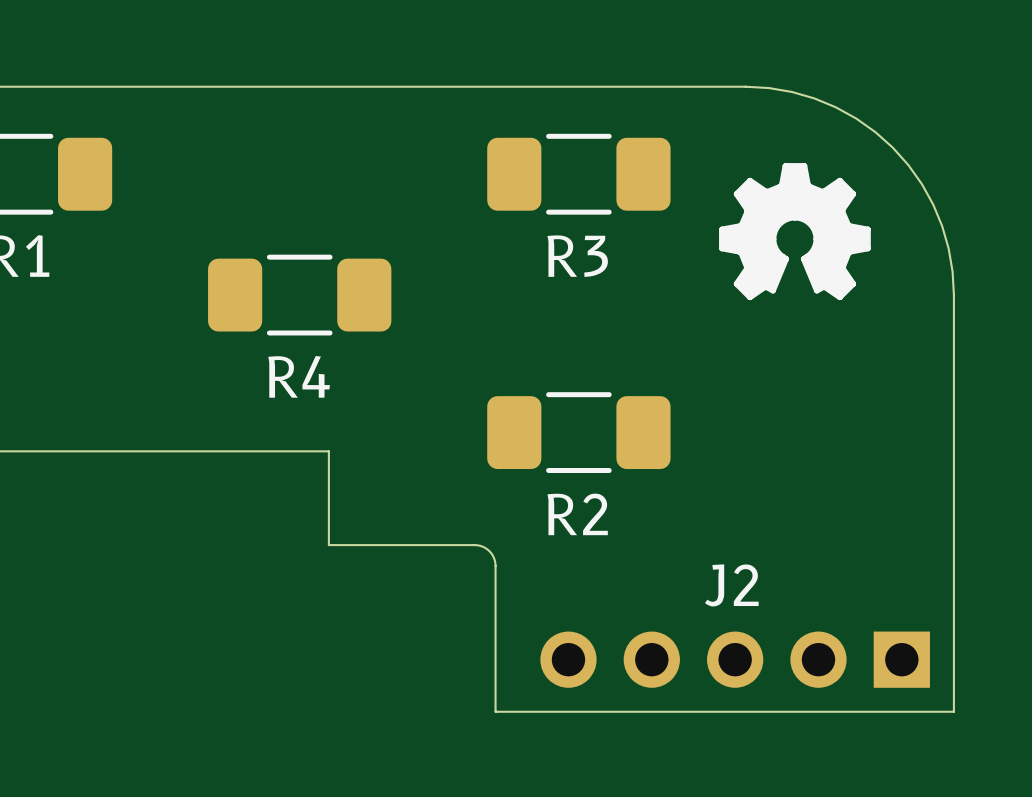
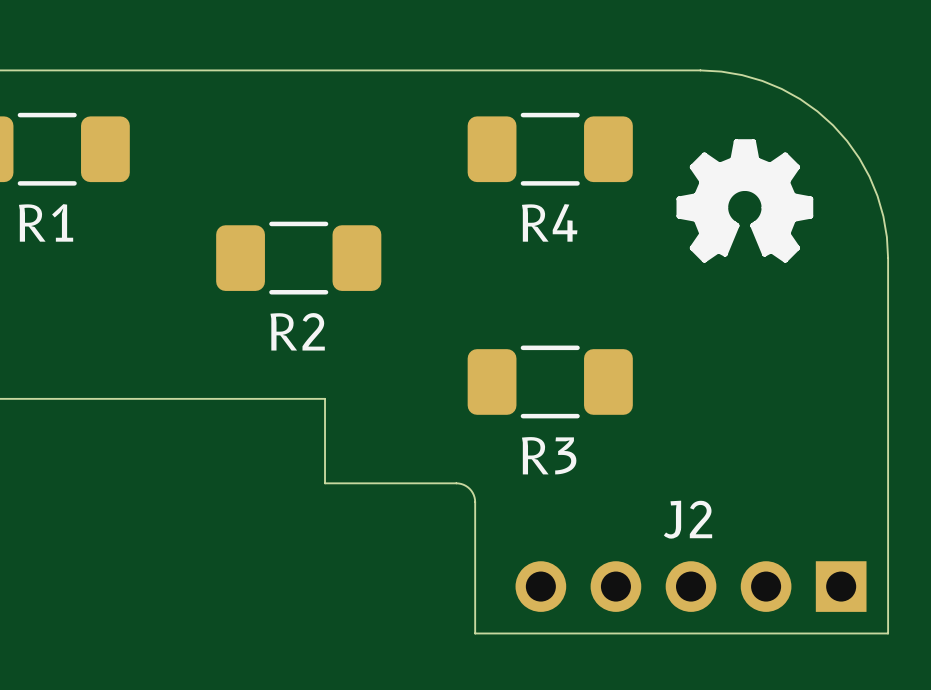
R3 name: R3 (577, 256) -> R4 (549, 222)
R4 name: R4 (299, 376) -> R2 (297, 331)
R2 name: R2 (577, 514) -> R3 (549, 455)

